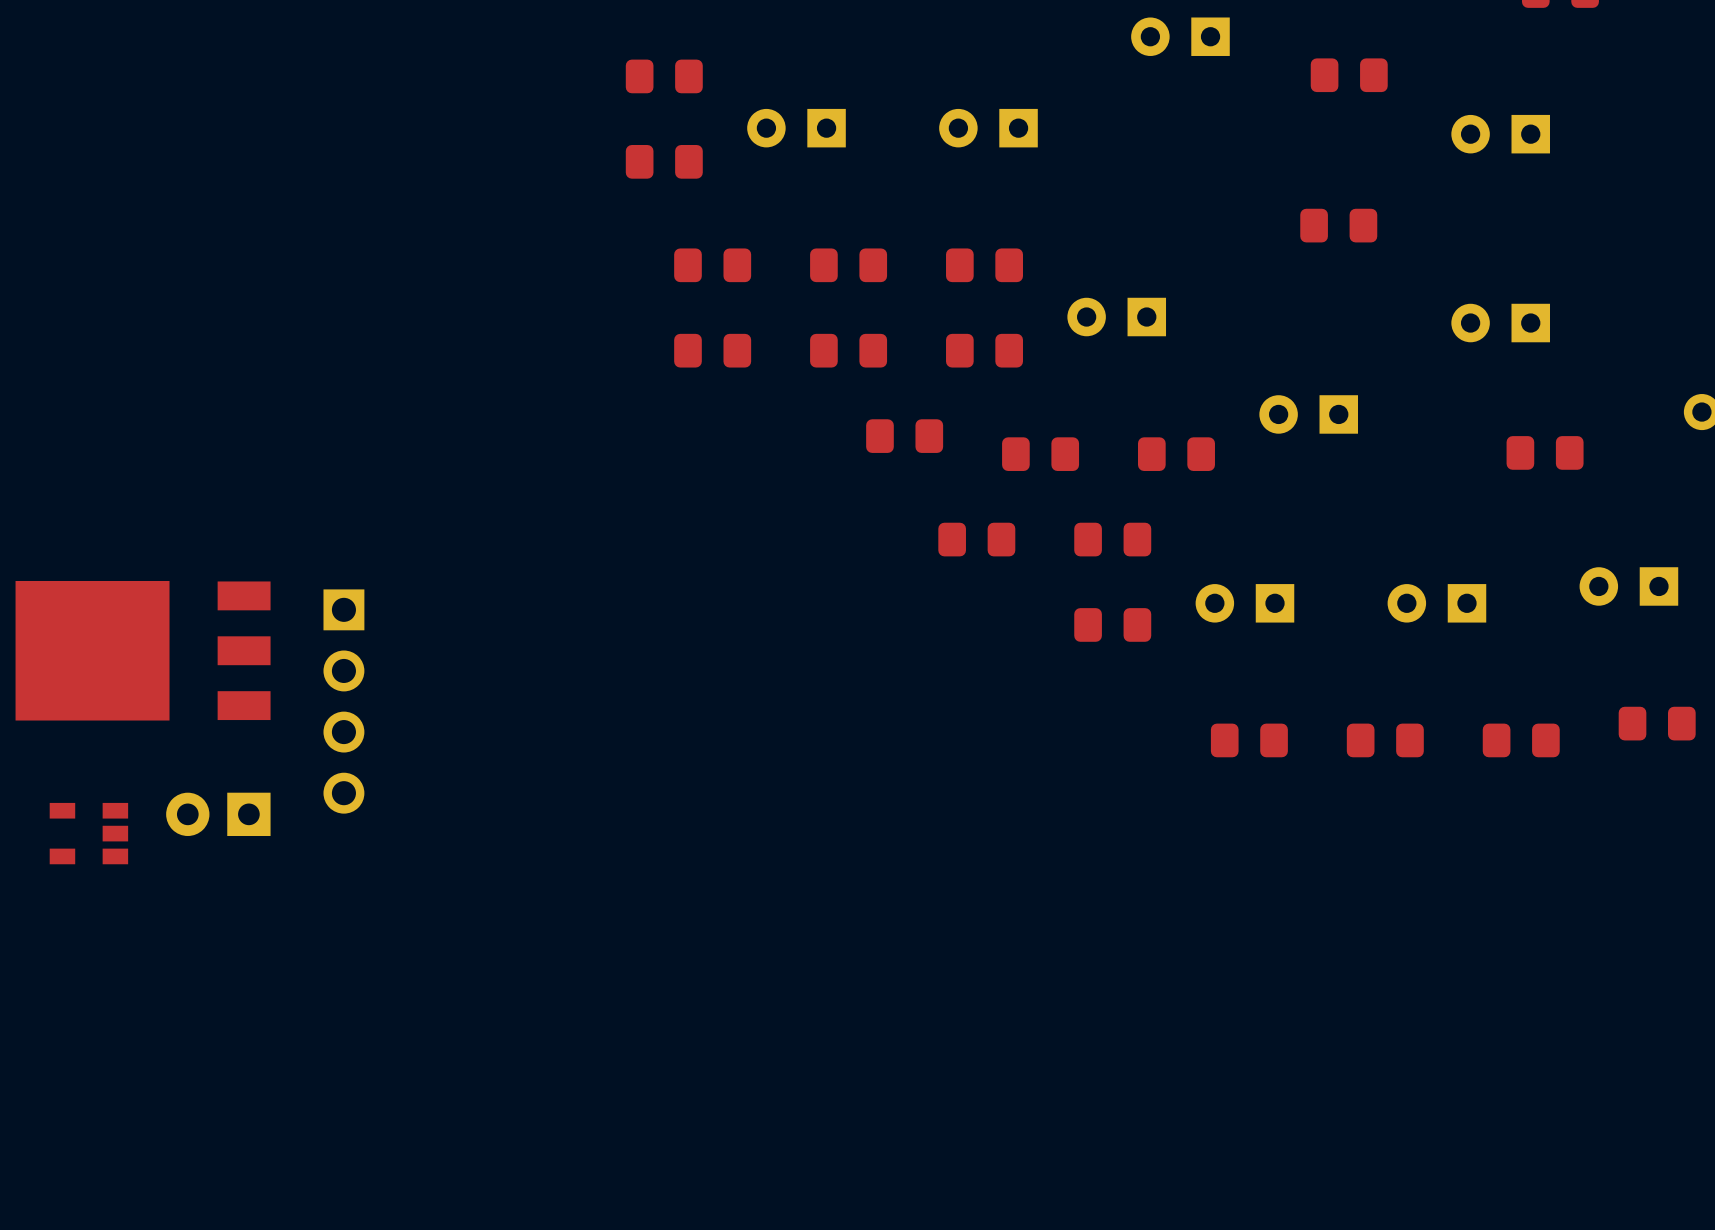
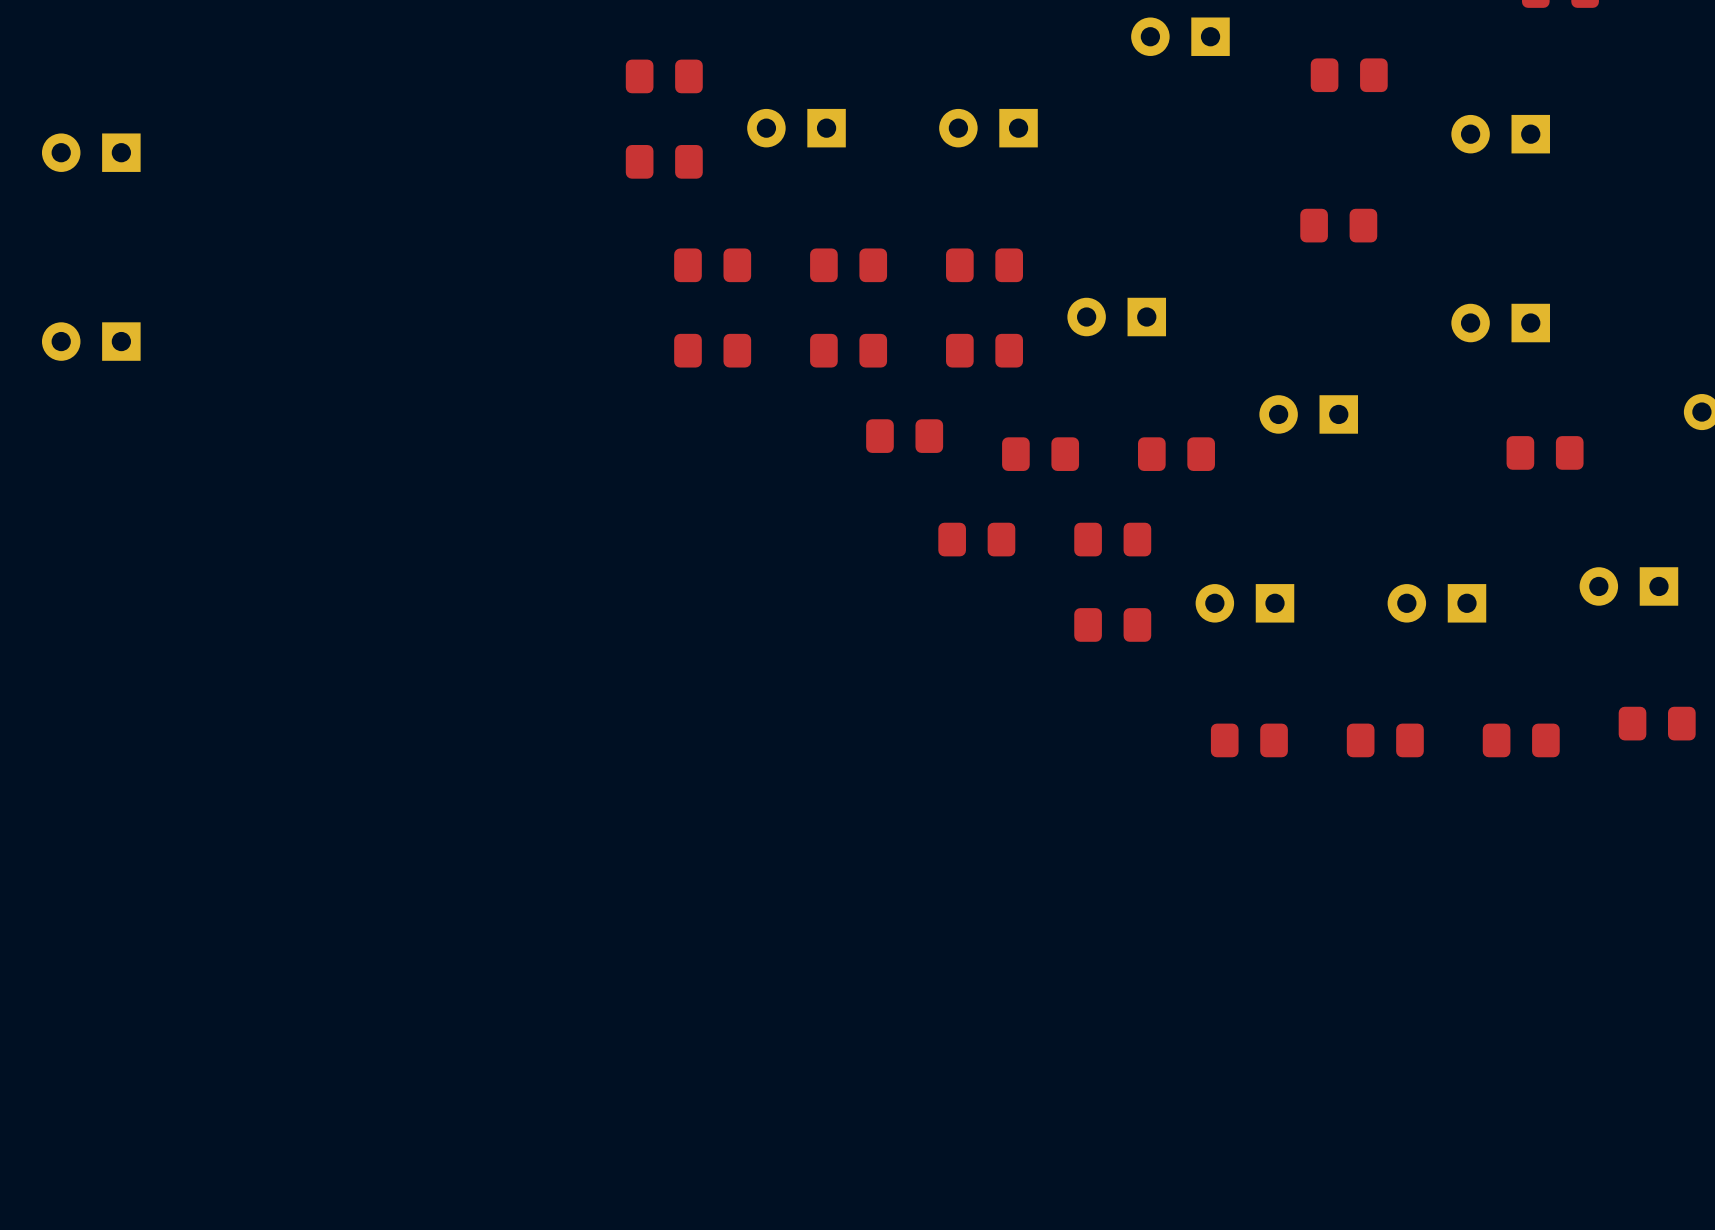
part: none -> (91, 152)
part: none -> (91, 341)
part: (143, 650) -> none
part: (343, 701) -> none
part: (218, 814) -> none
part: (88, 833) -> none

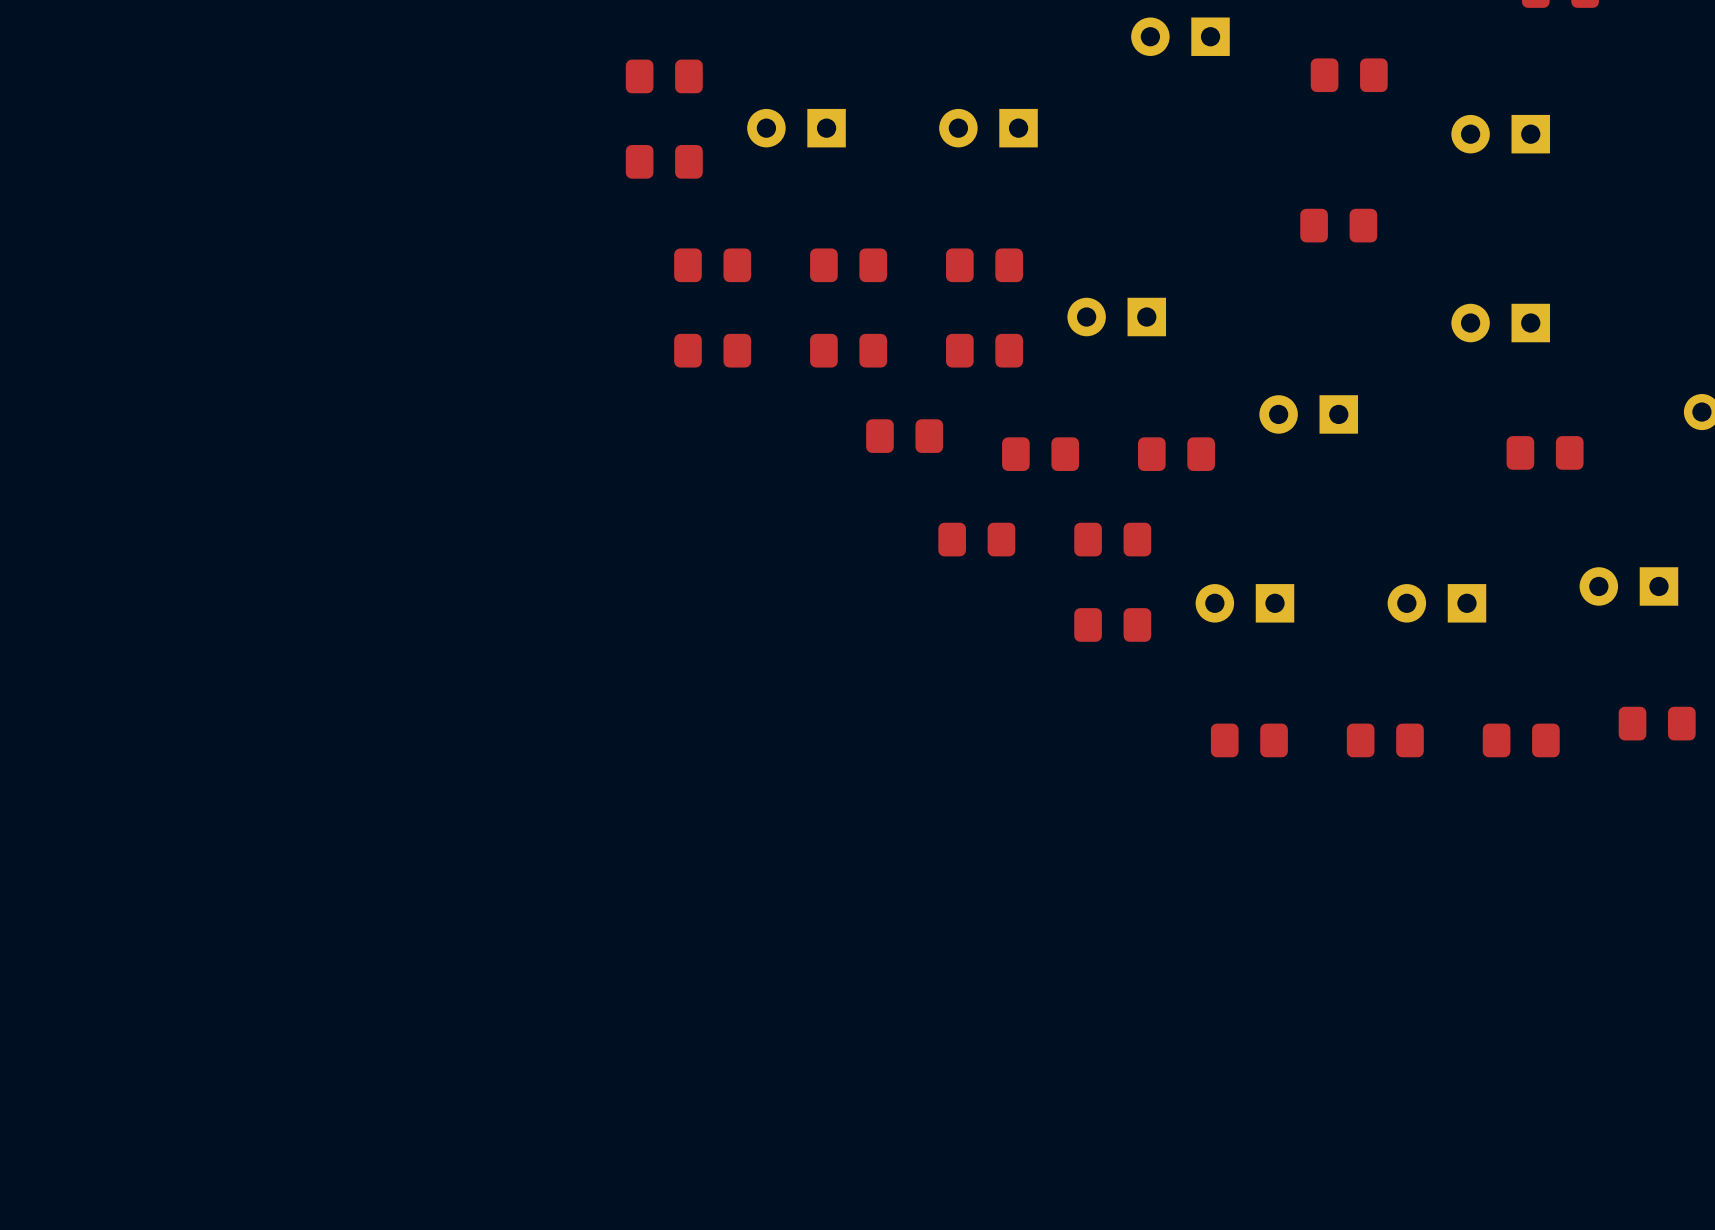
part: (91, 152) -> none
part: (91, 341) -> none

